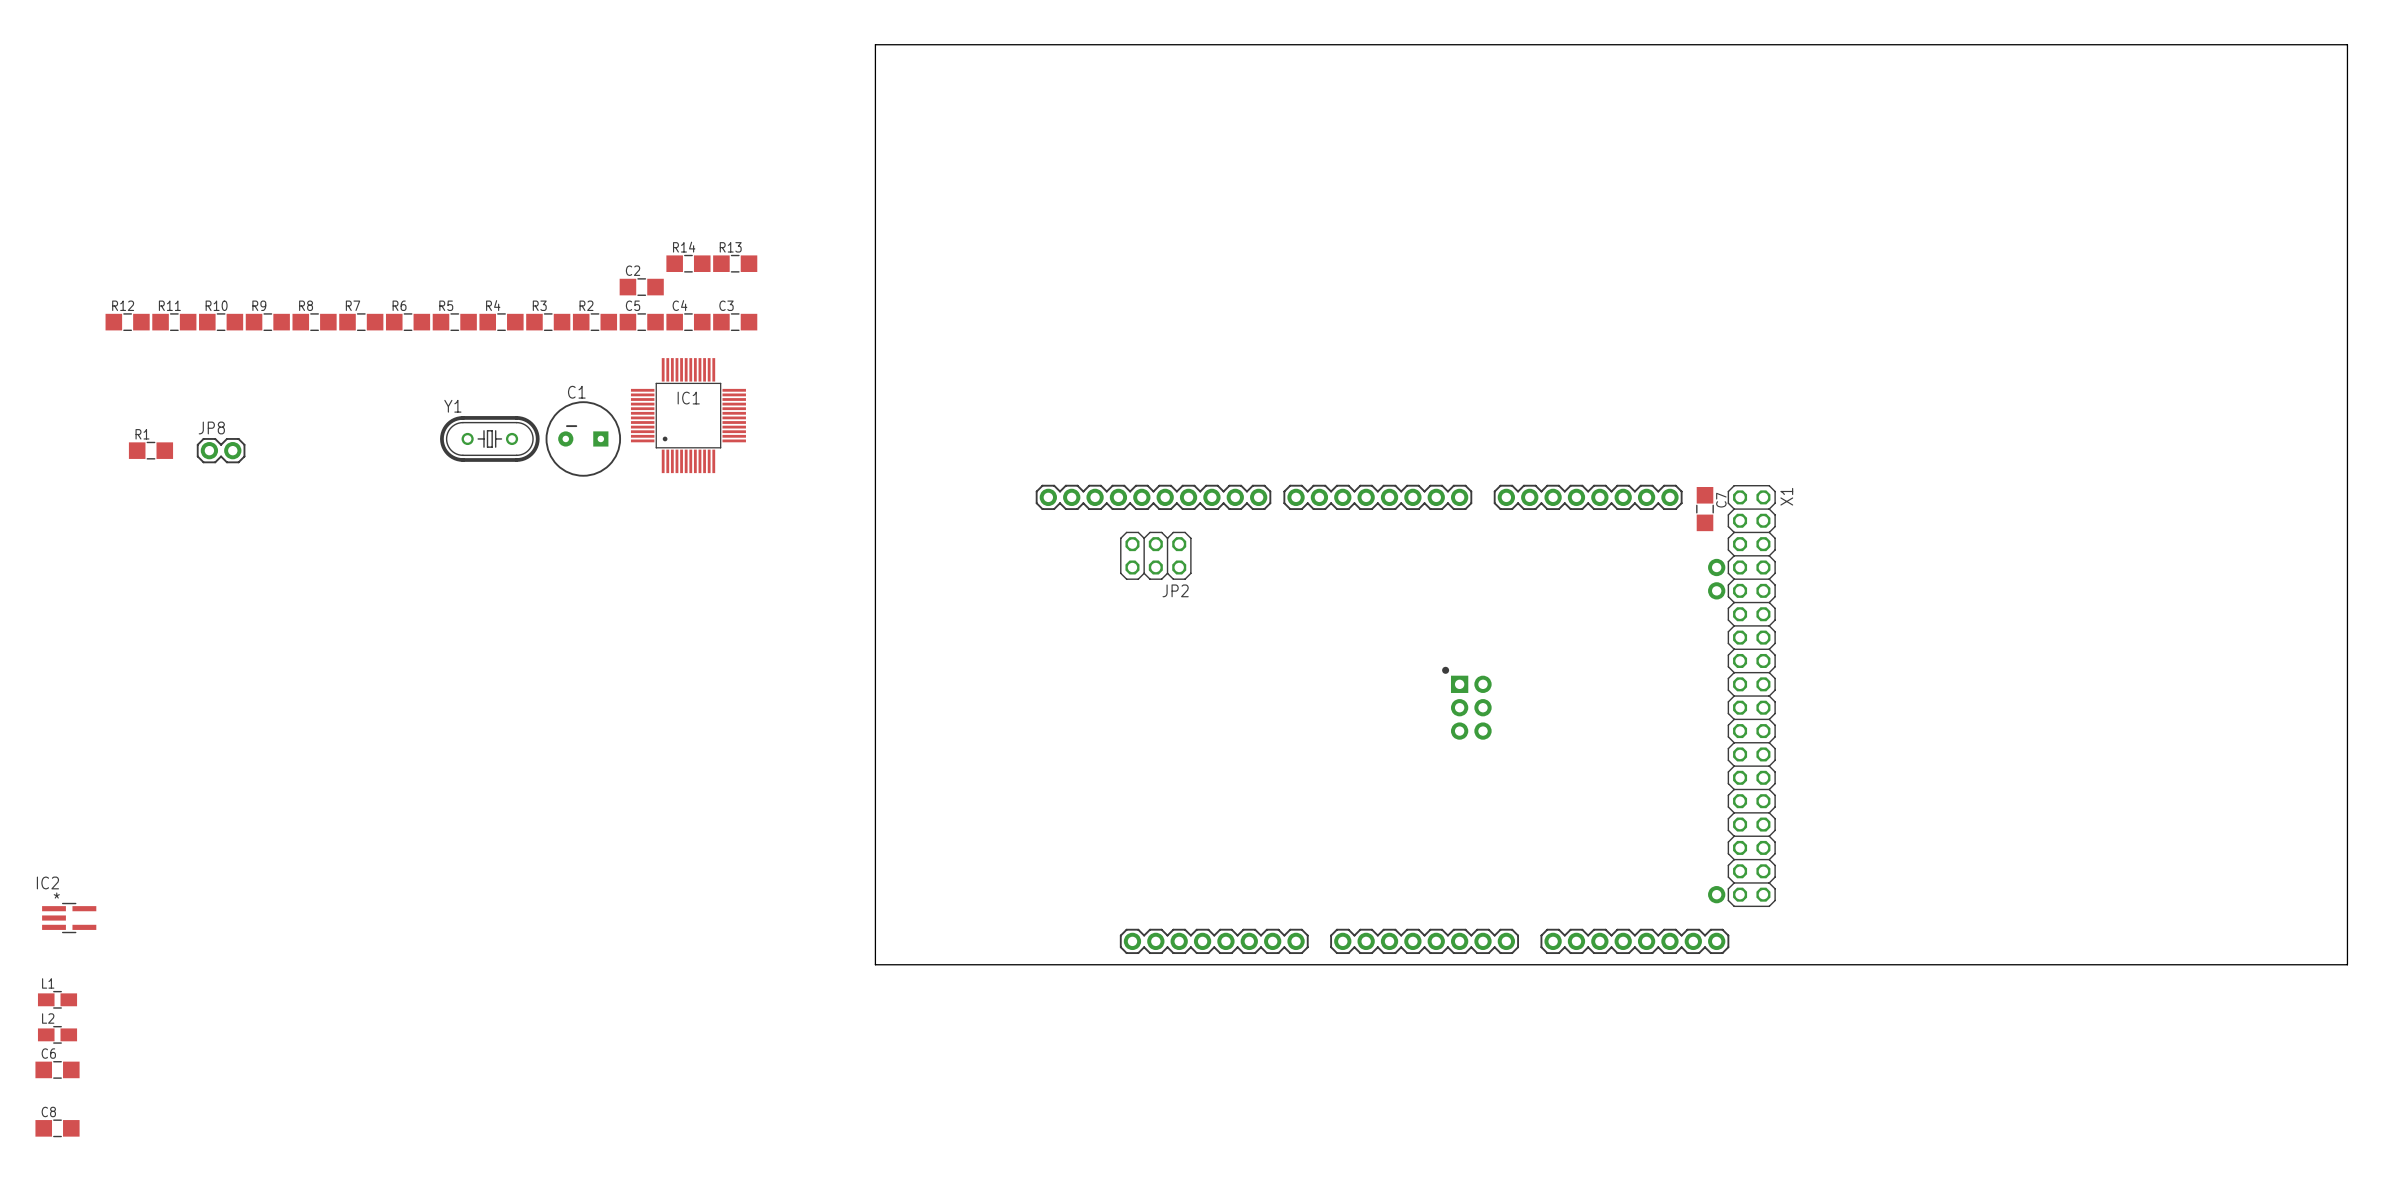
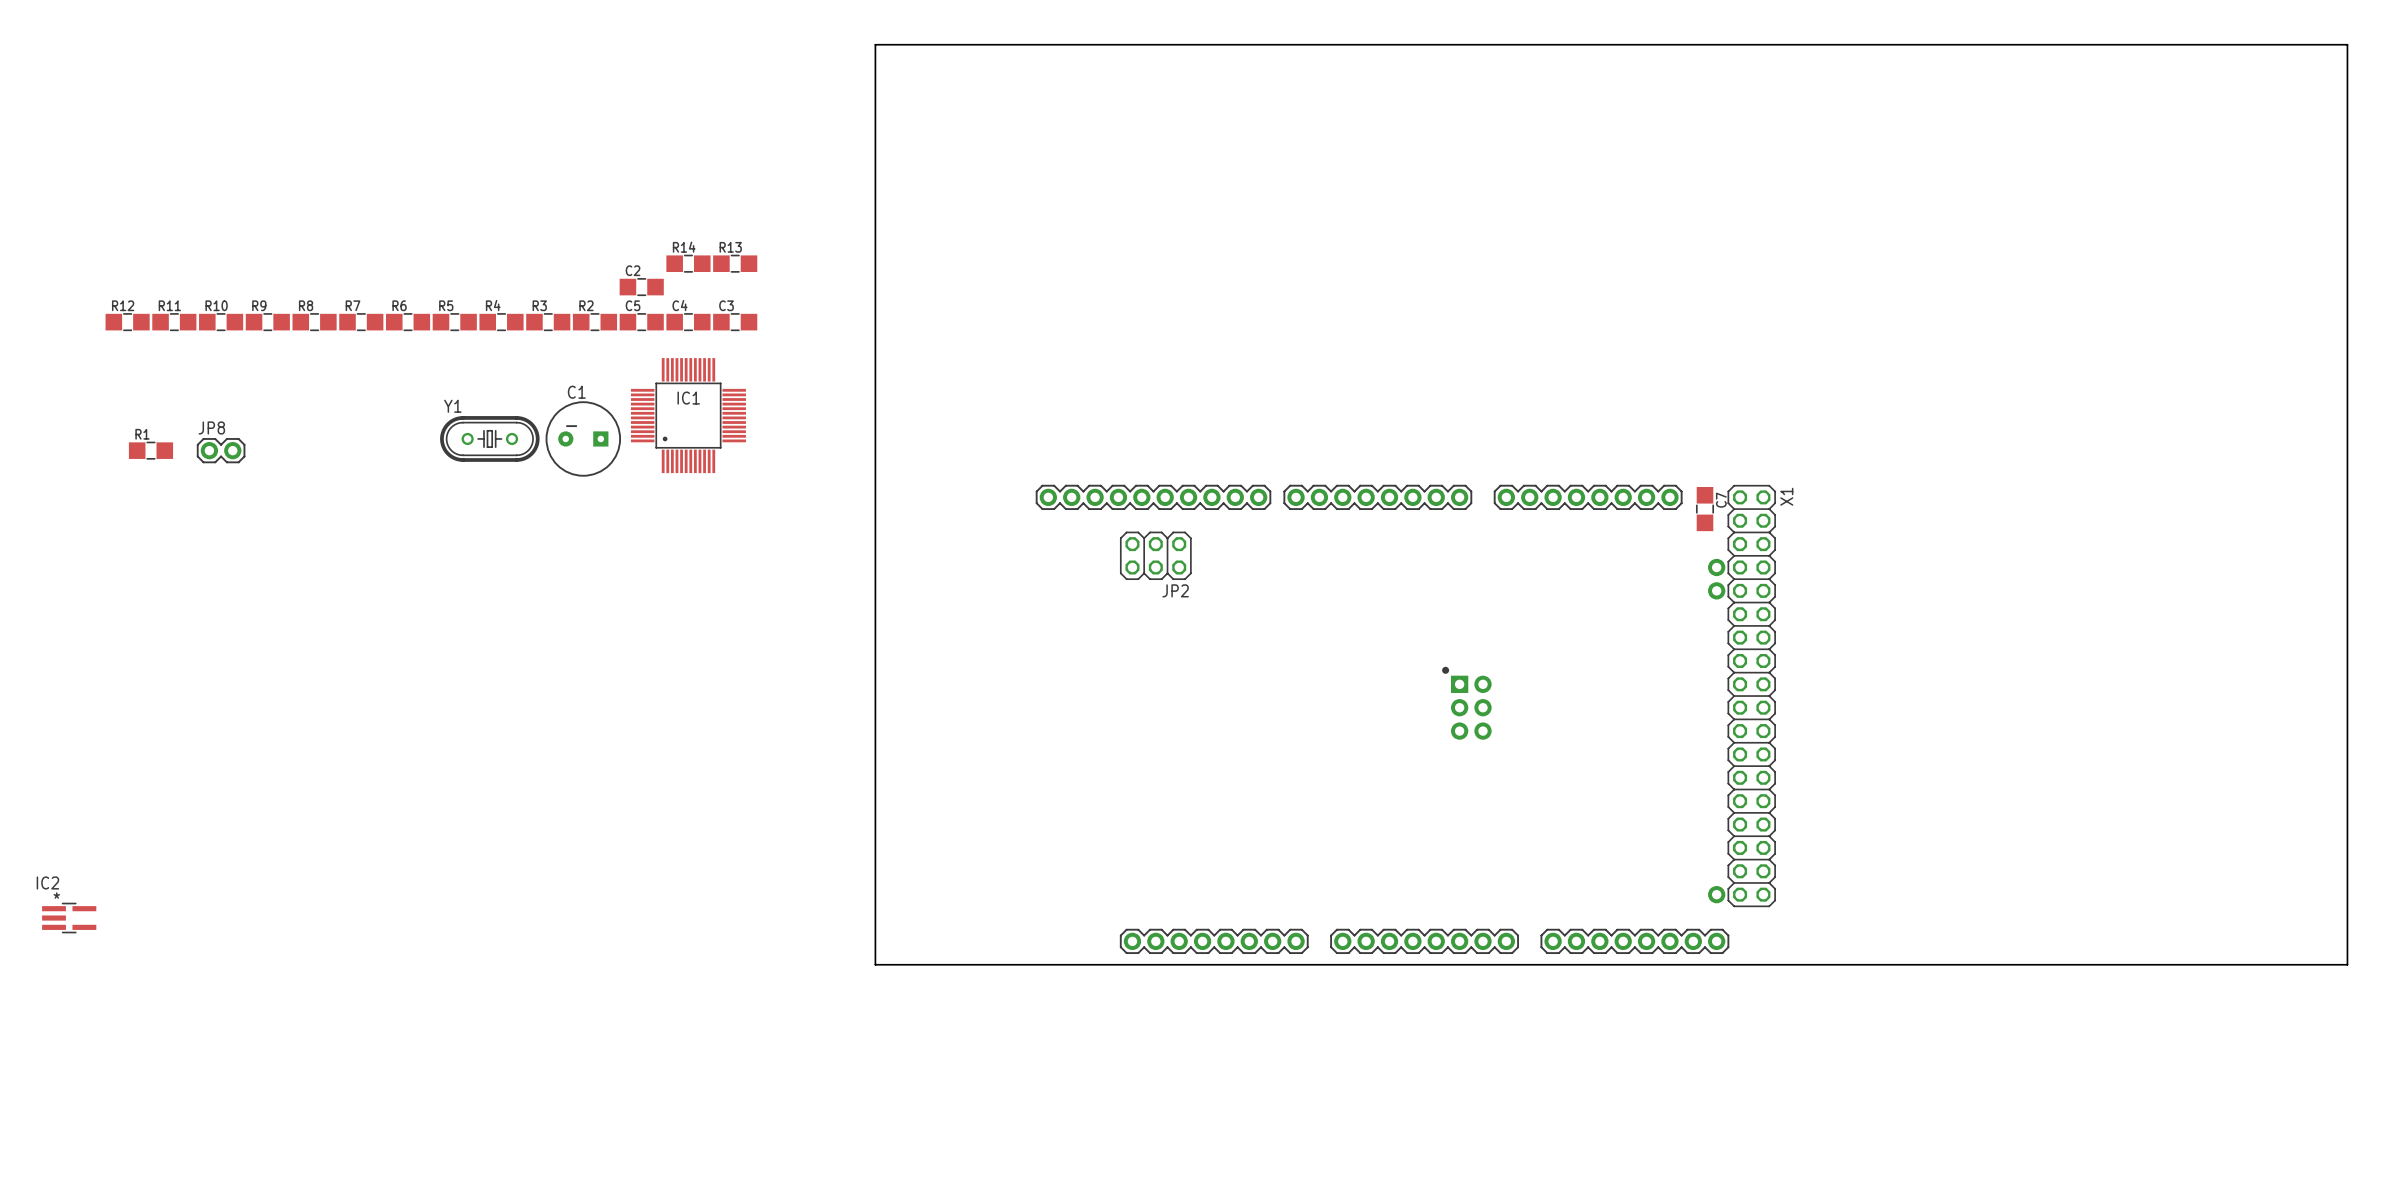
L1: (57, 999) -> none
L2: (57, 1034) -> none
C6: (57, 1069) -> none
C8: (57, 1128) -> none

